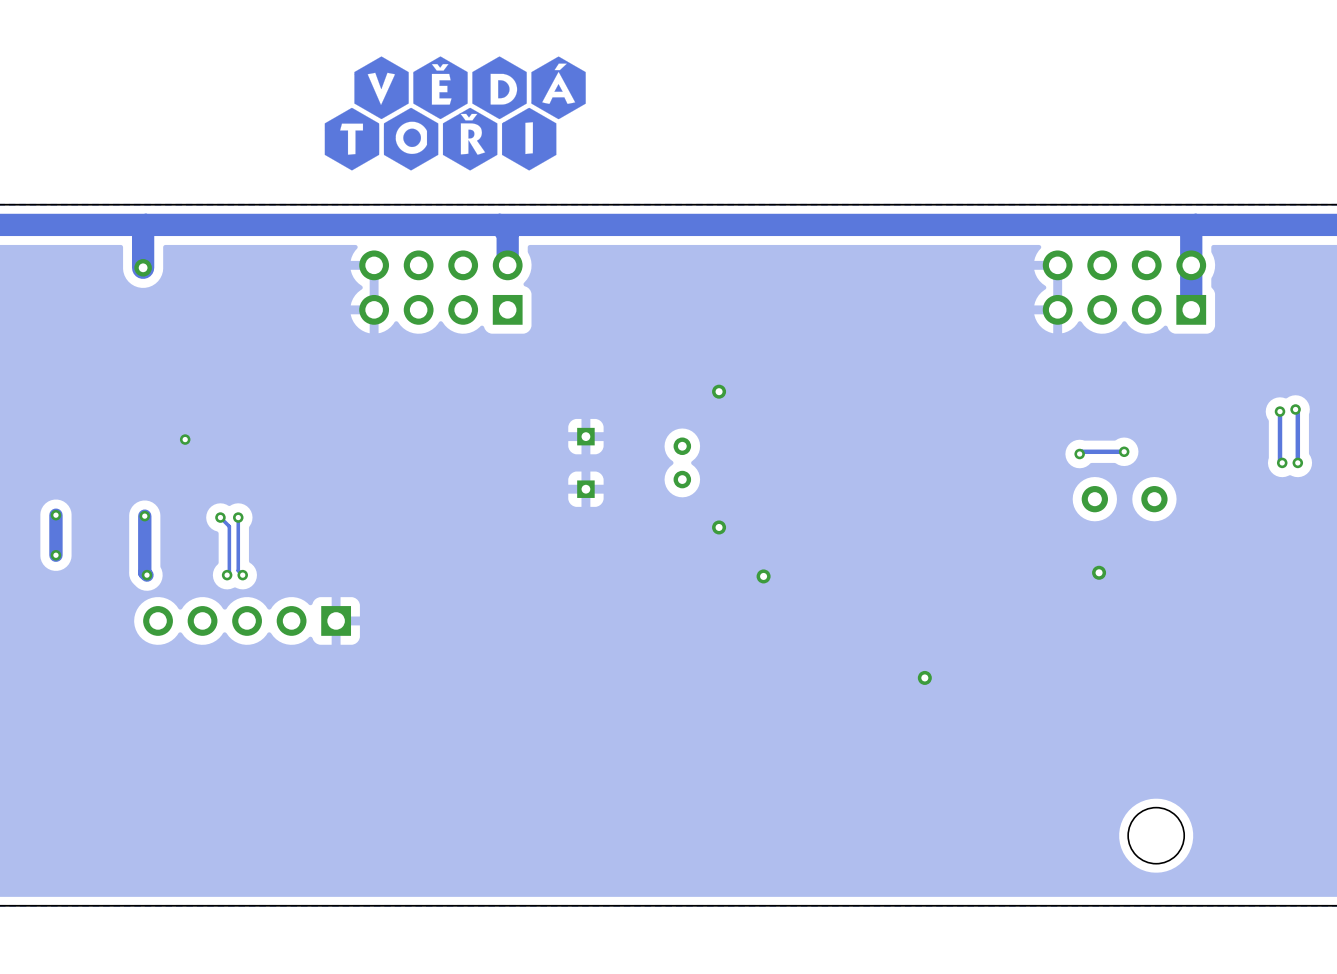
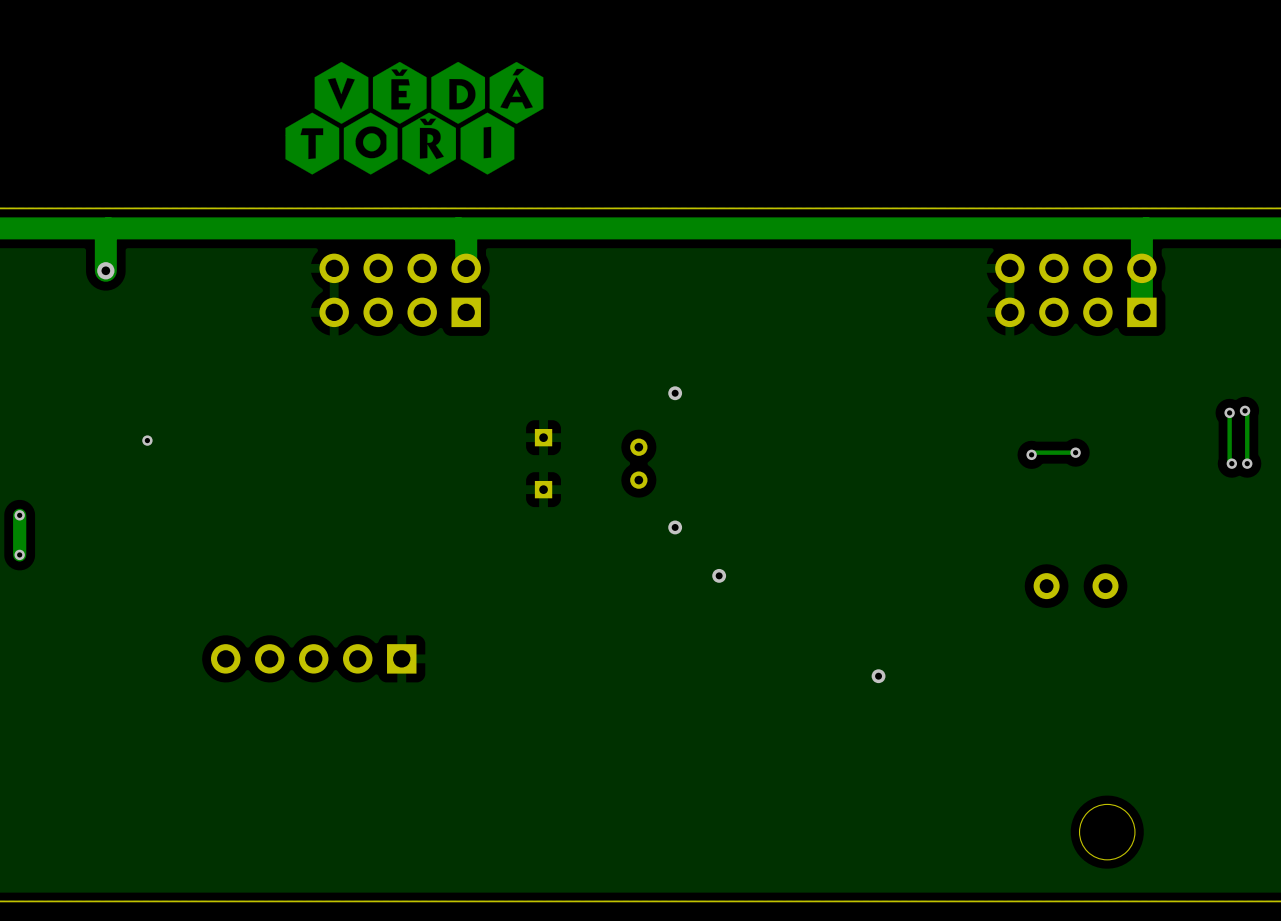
part position: (1124, 499) -> (1076, 586)
track: (144, 516) (144, 572) (146, 575) -> none
via: (144, 516) -> none
track: (220, 517) (229, 526) (229, 572) (227, 575) -> none
via: (220, 517) -> none
track: (238, 517) (238, 570) (242, 575) -> none
via: (238, 517) -> none
via: (1099, 572) -> none
via: (146, 575) -> none
via: (227, 575) -> none
via: (242, 575) -> none
part position: (247, 620) -> (313, 658)

